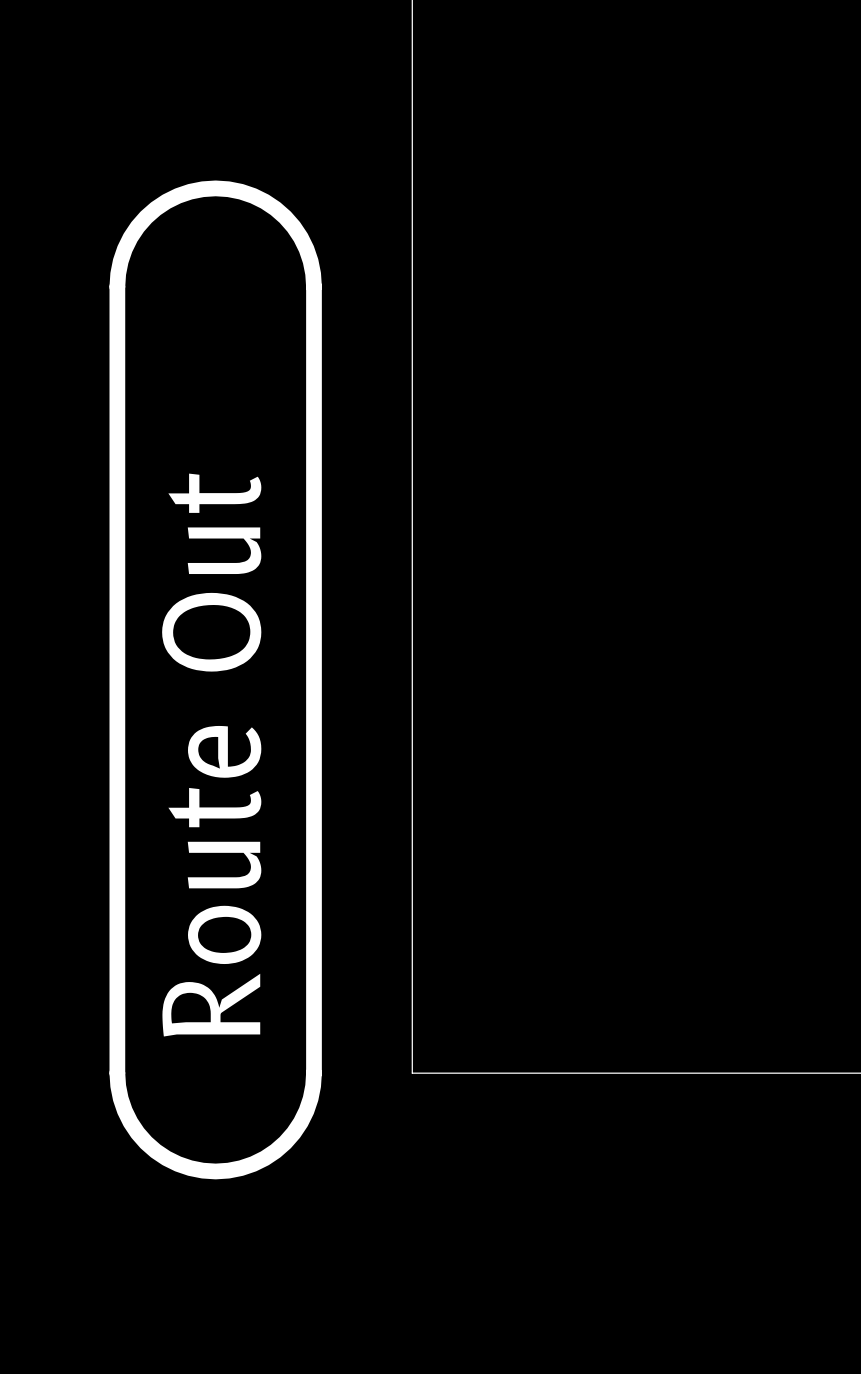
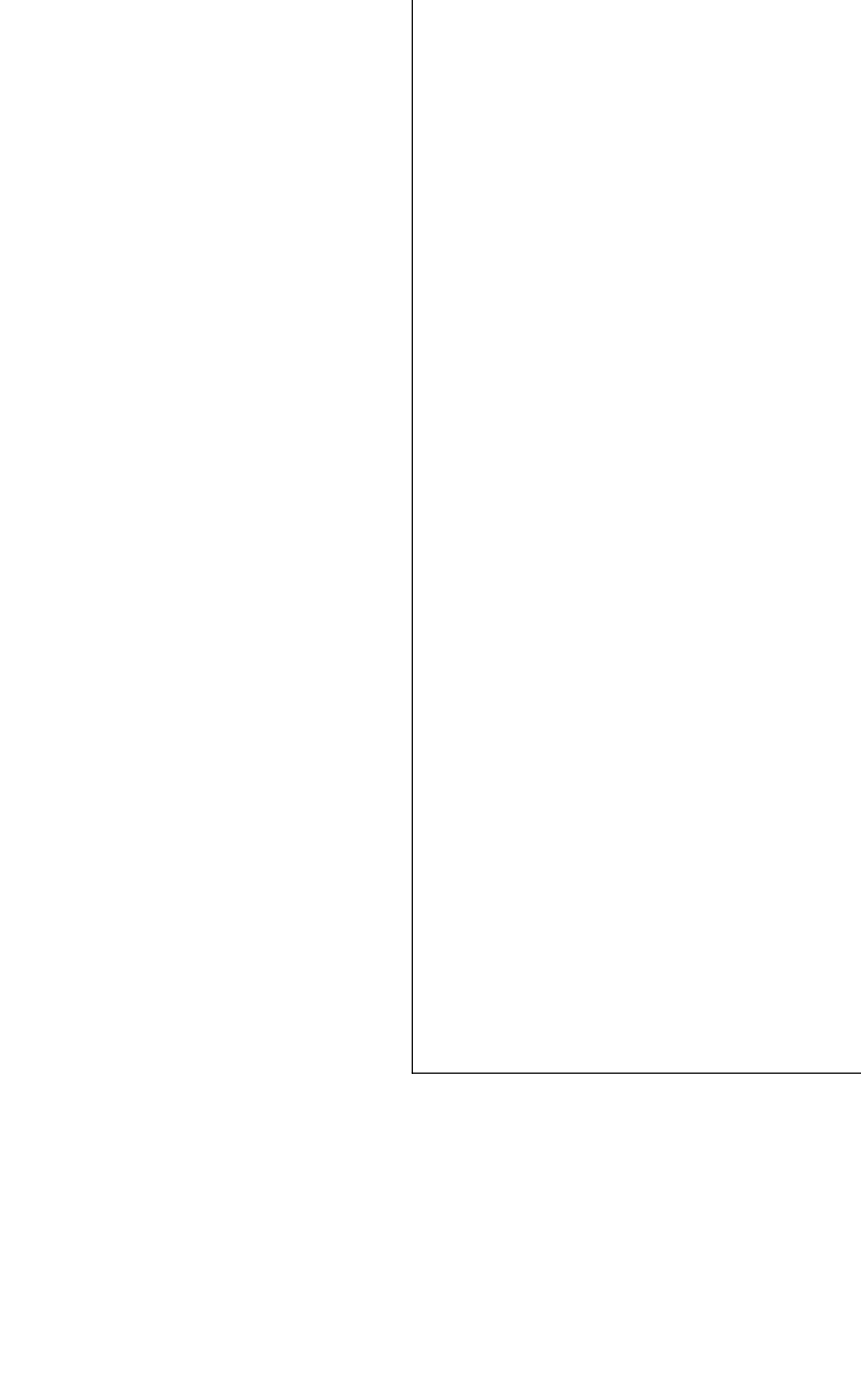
board edge: (117, 286) (118, 1086) (120, 1098) (130, 1122) (137, 1133) (155, 1151) (166, 1158) (190, 1168) (215, 1171) (228, 1170) (241, 1168) (264, 1158) (285, 1142) (300, 1122) (310, 1098) (313, 1086) (313, 273) (310, 261) (300, 237) (293, 226) (275, 208) (264, 201) (241, 191) (215, 188) (190, 191) (178, 195) (166, 201) (146, 217) (130, 237) (124, 249) (120, 261) (117, 286) -> none
text: Route Out (211, 755) -> none

